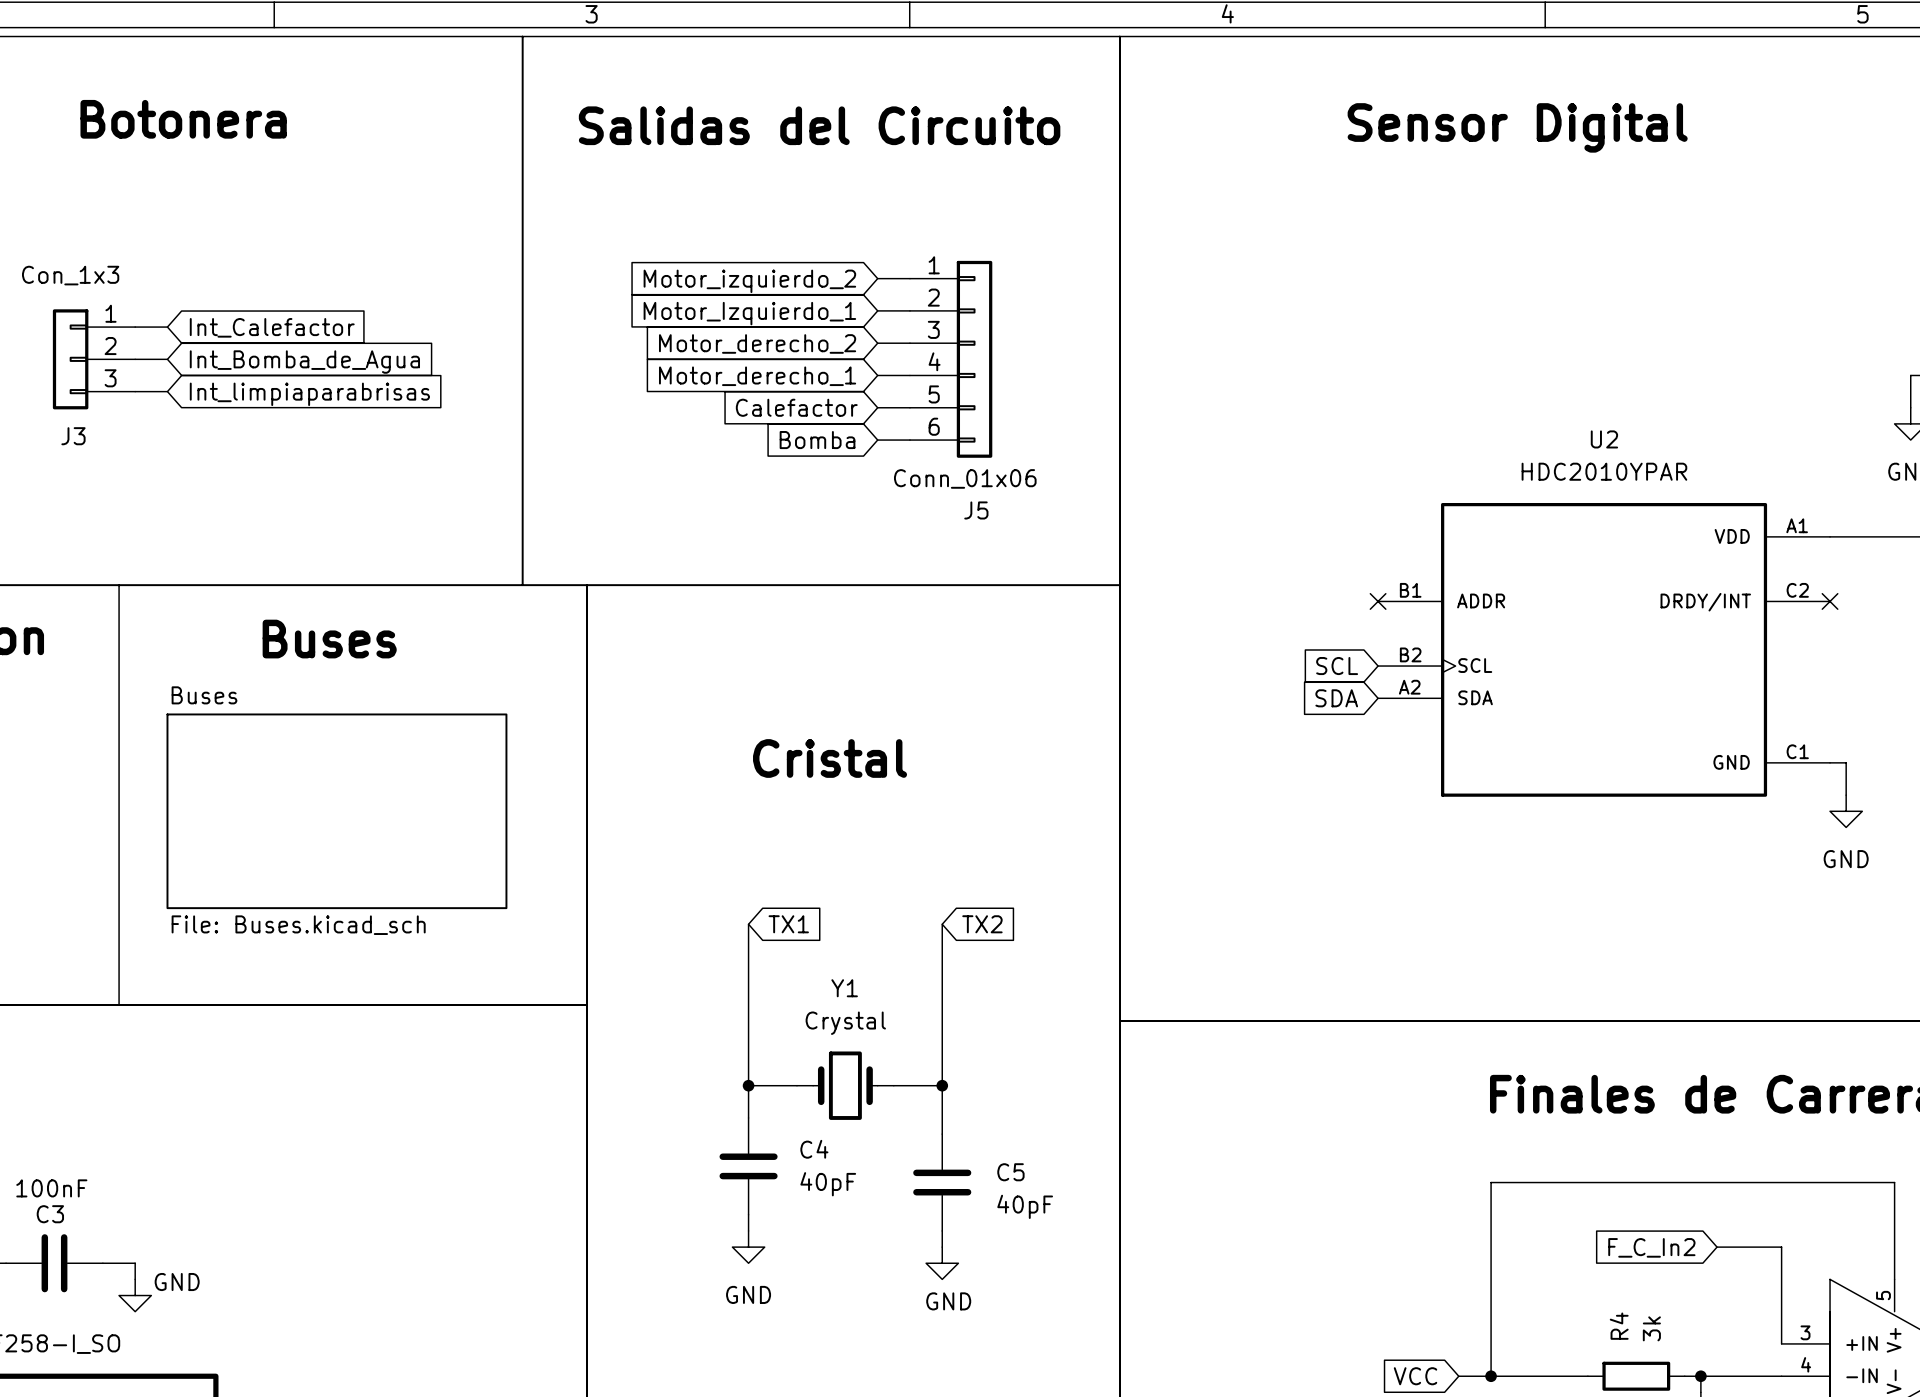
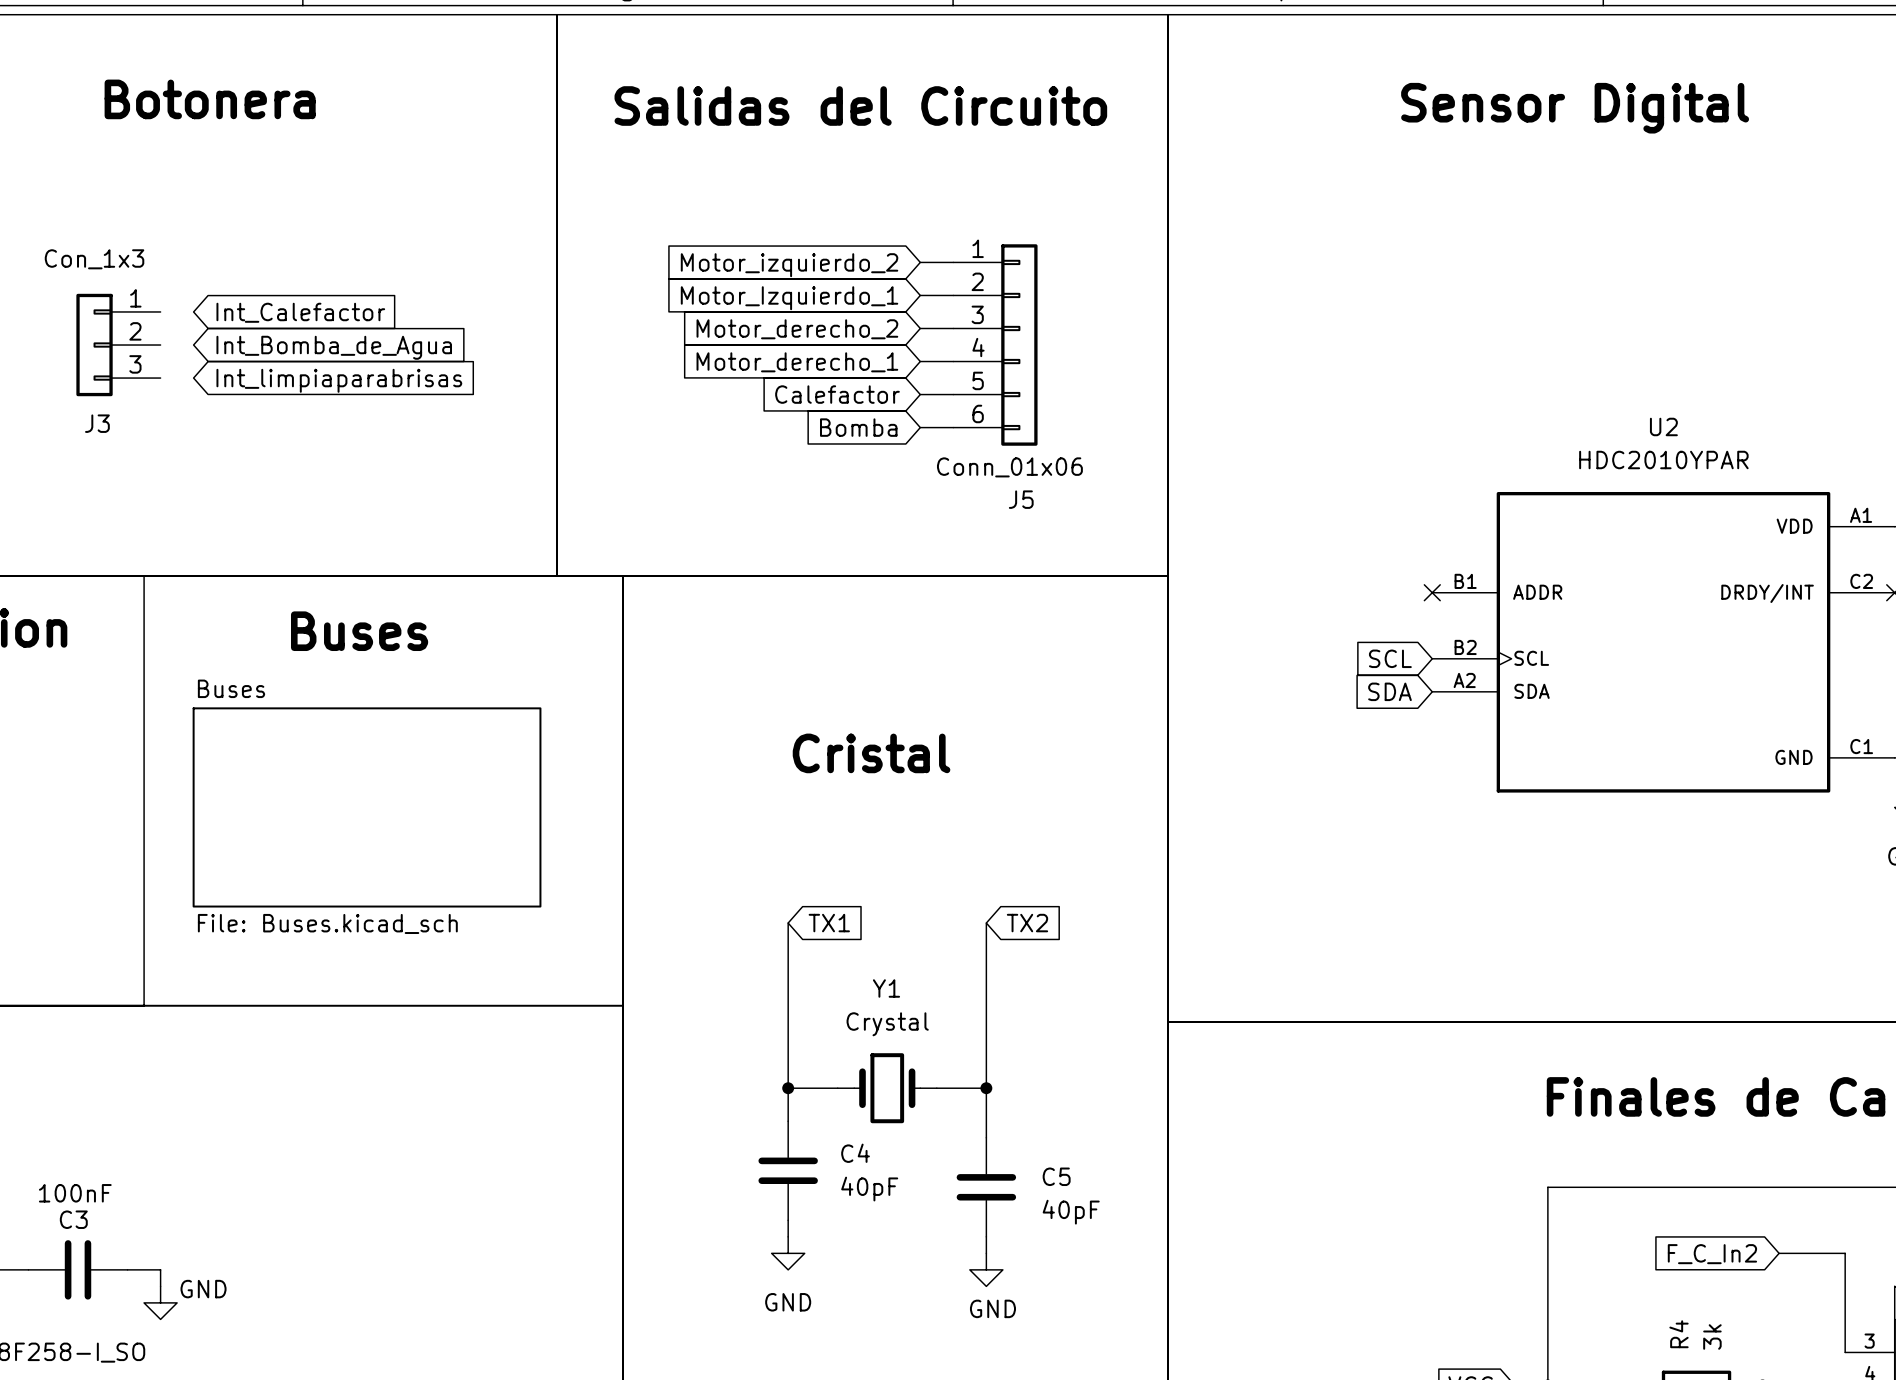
wire: (135, 327) (167, 327) -> none
wire: (135, 359) (167, 359) -> none
wire: (135, 391) (167, 391) -> none

